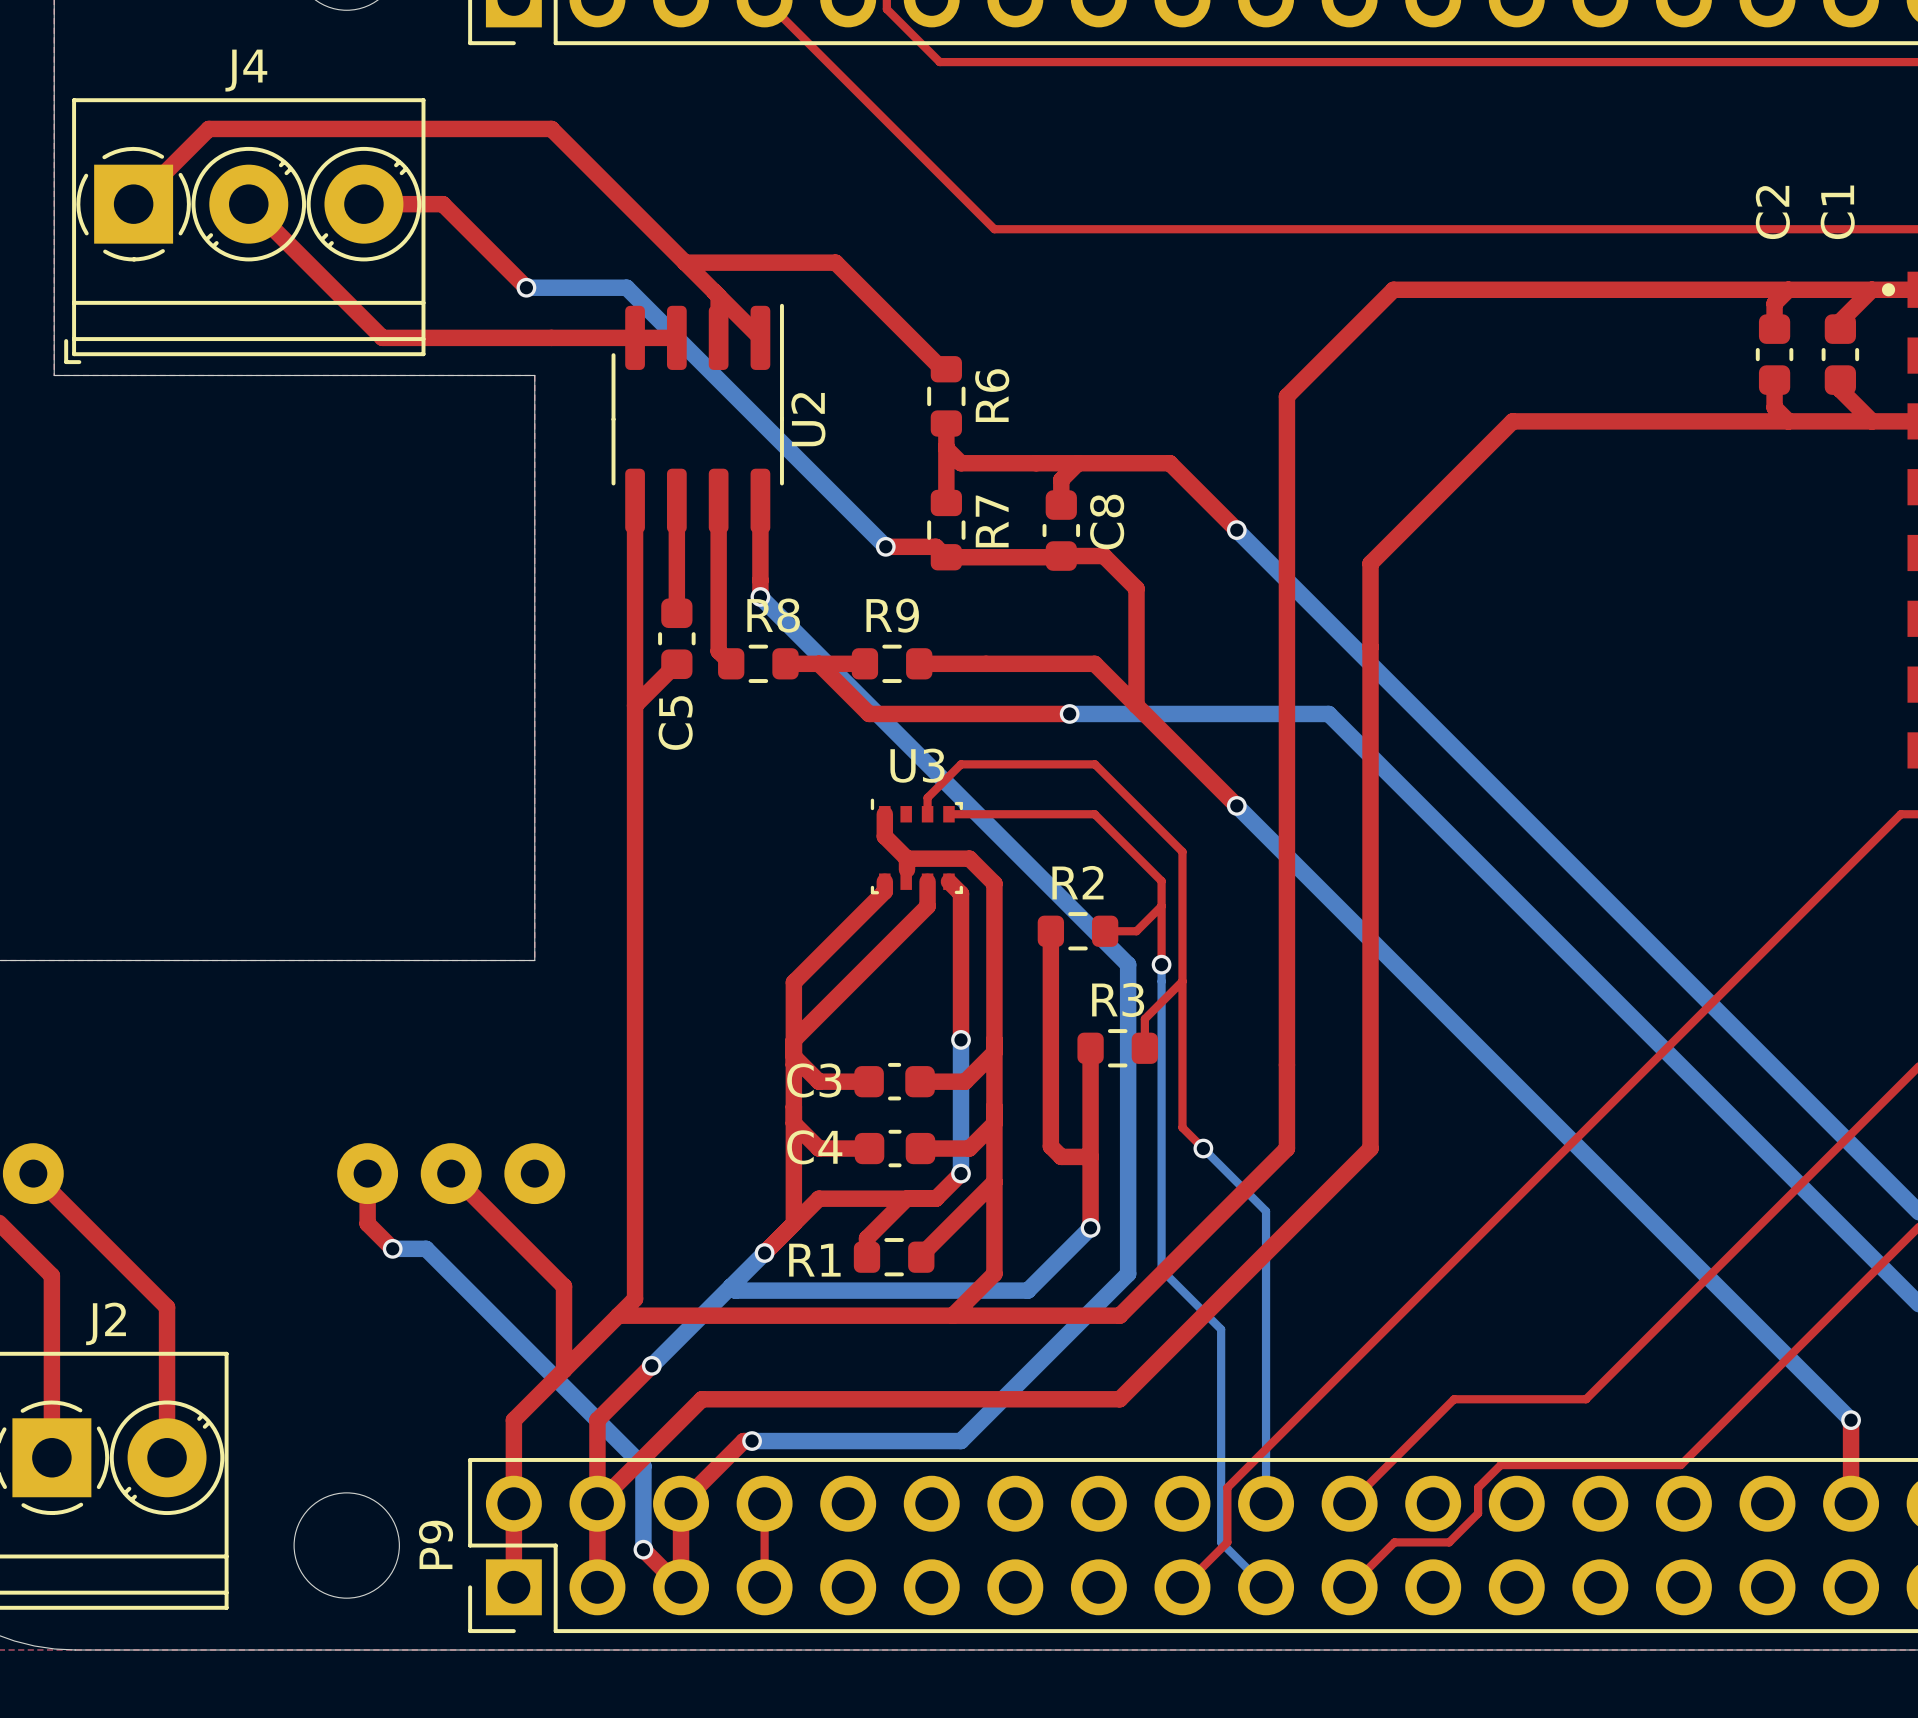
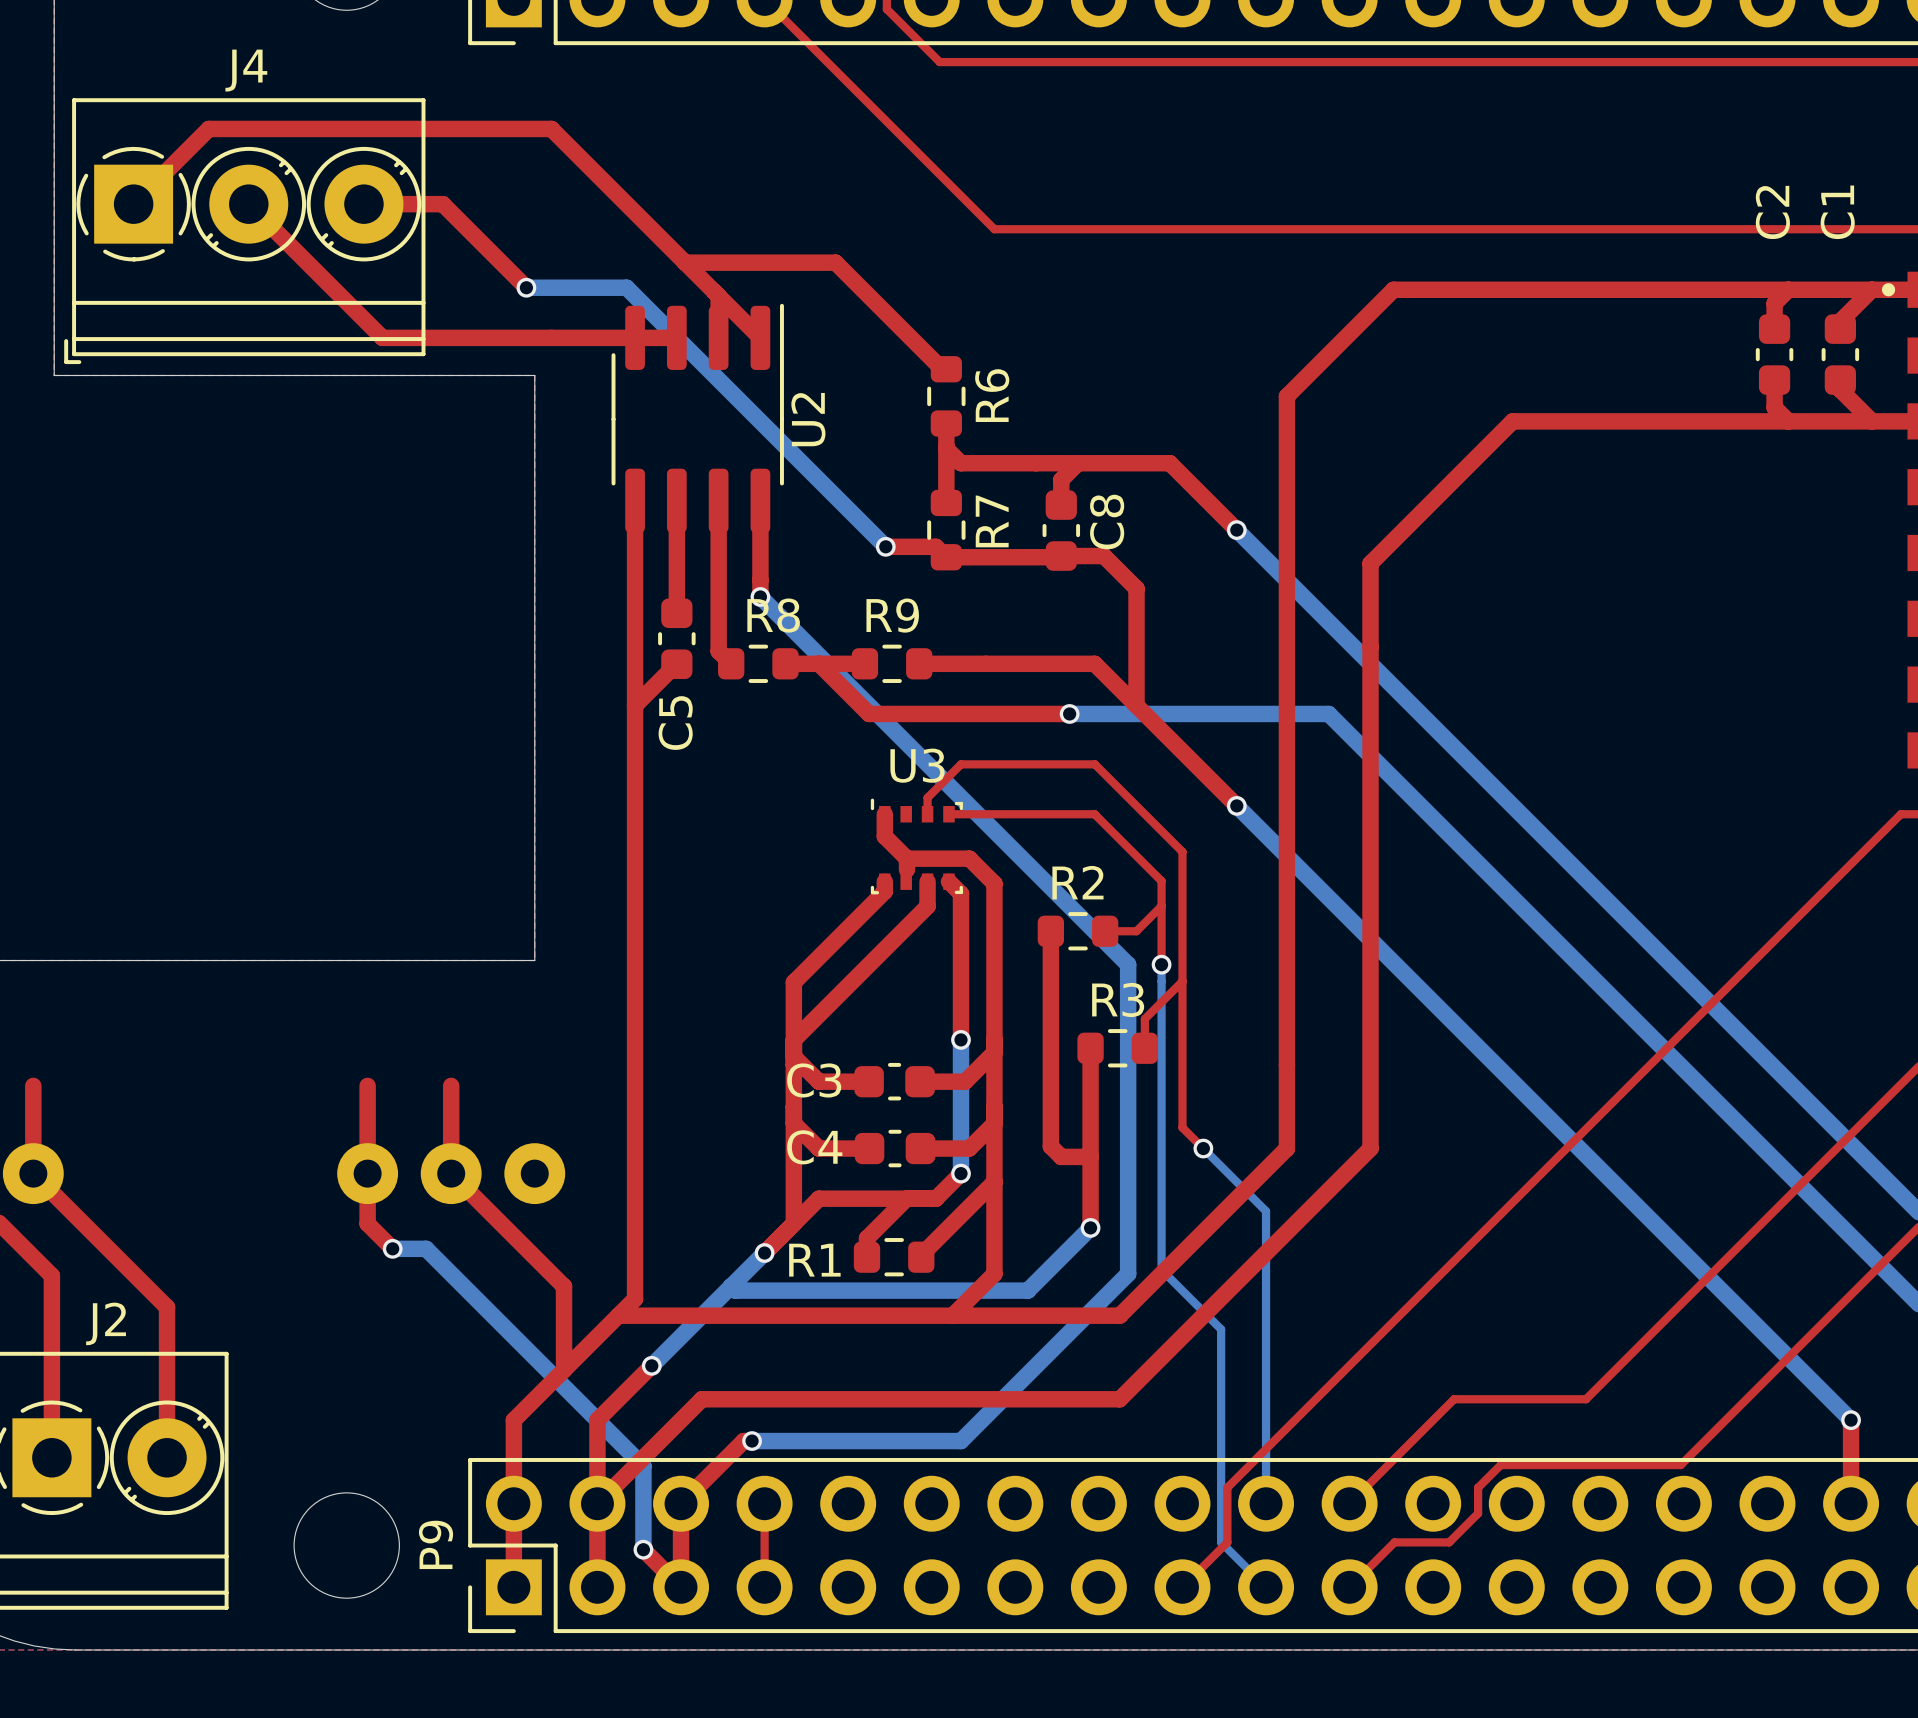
top track: none -> (33, 1085) (33, 1173)
top track: none -> (367, 1085) (367, 1173)
top track: none -> (451, 1085) (451, 1173)

